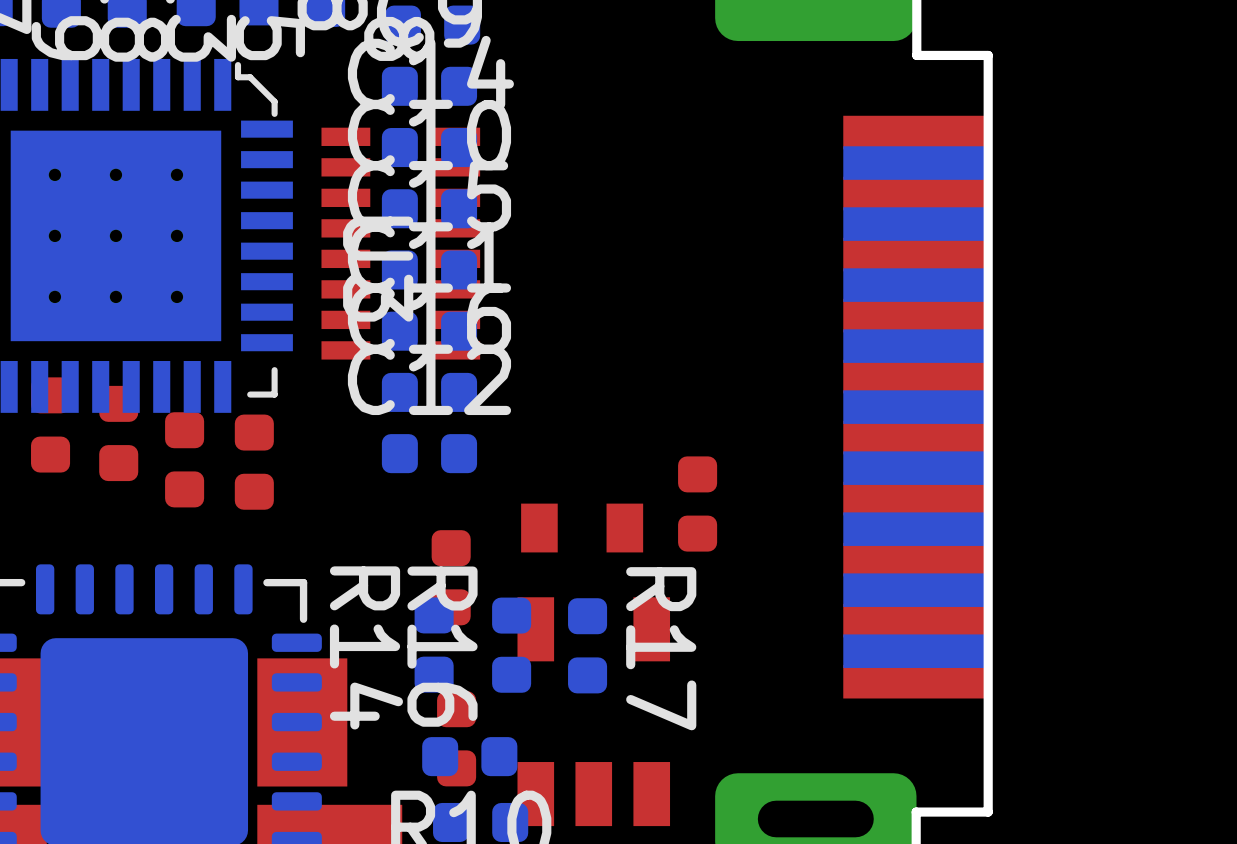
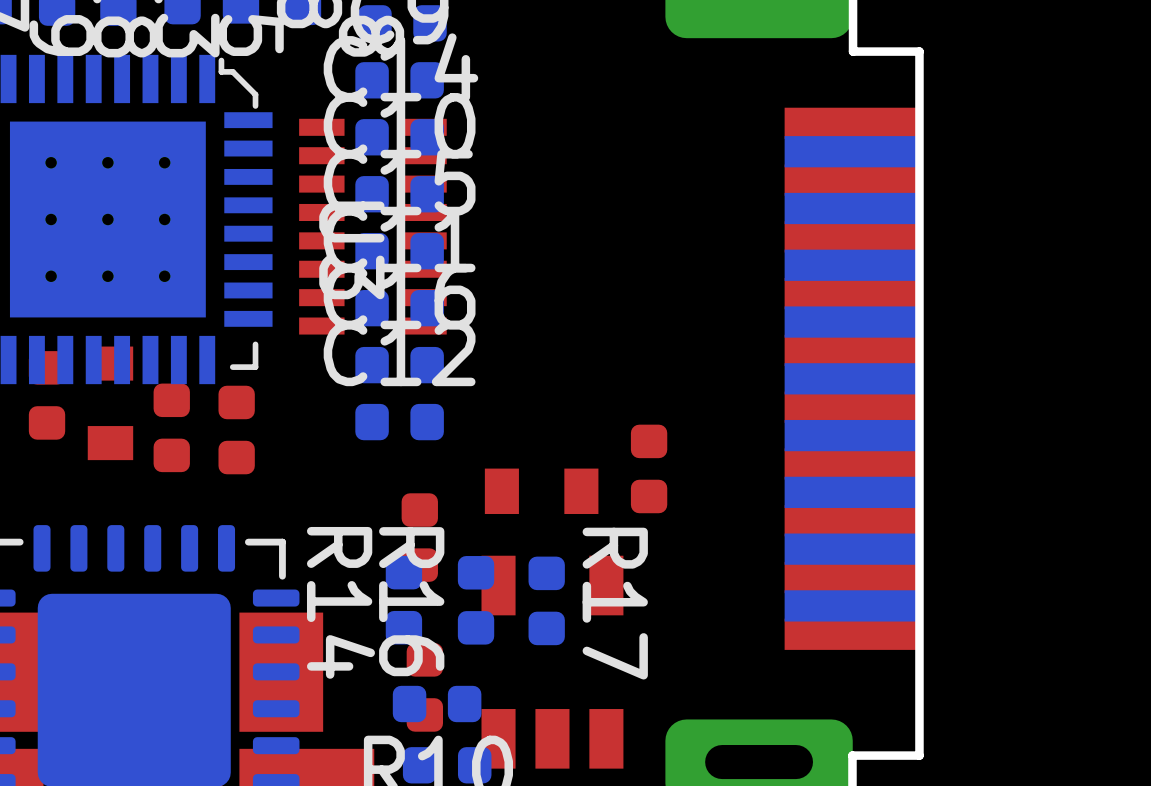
part footprint: [99, 385, 139, 482] -> [87, 346, 134, 461]

